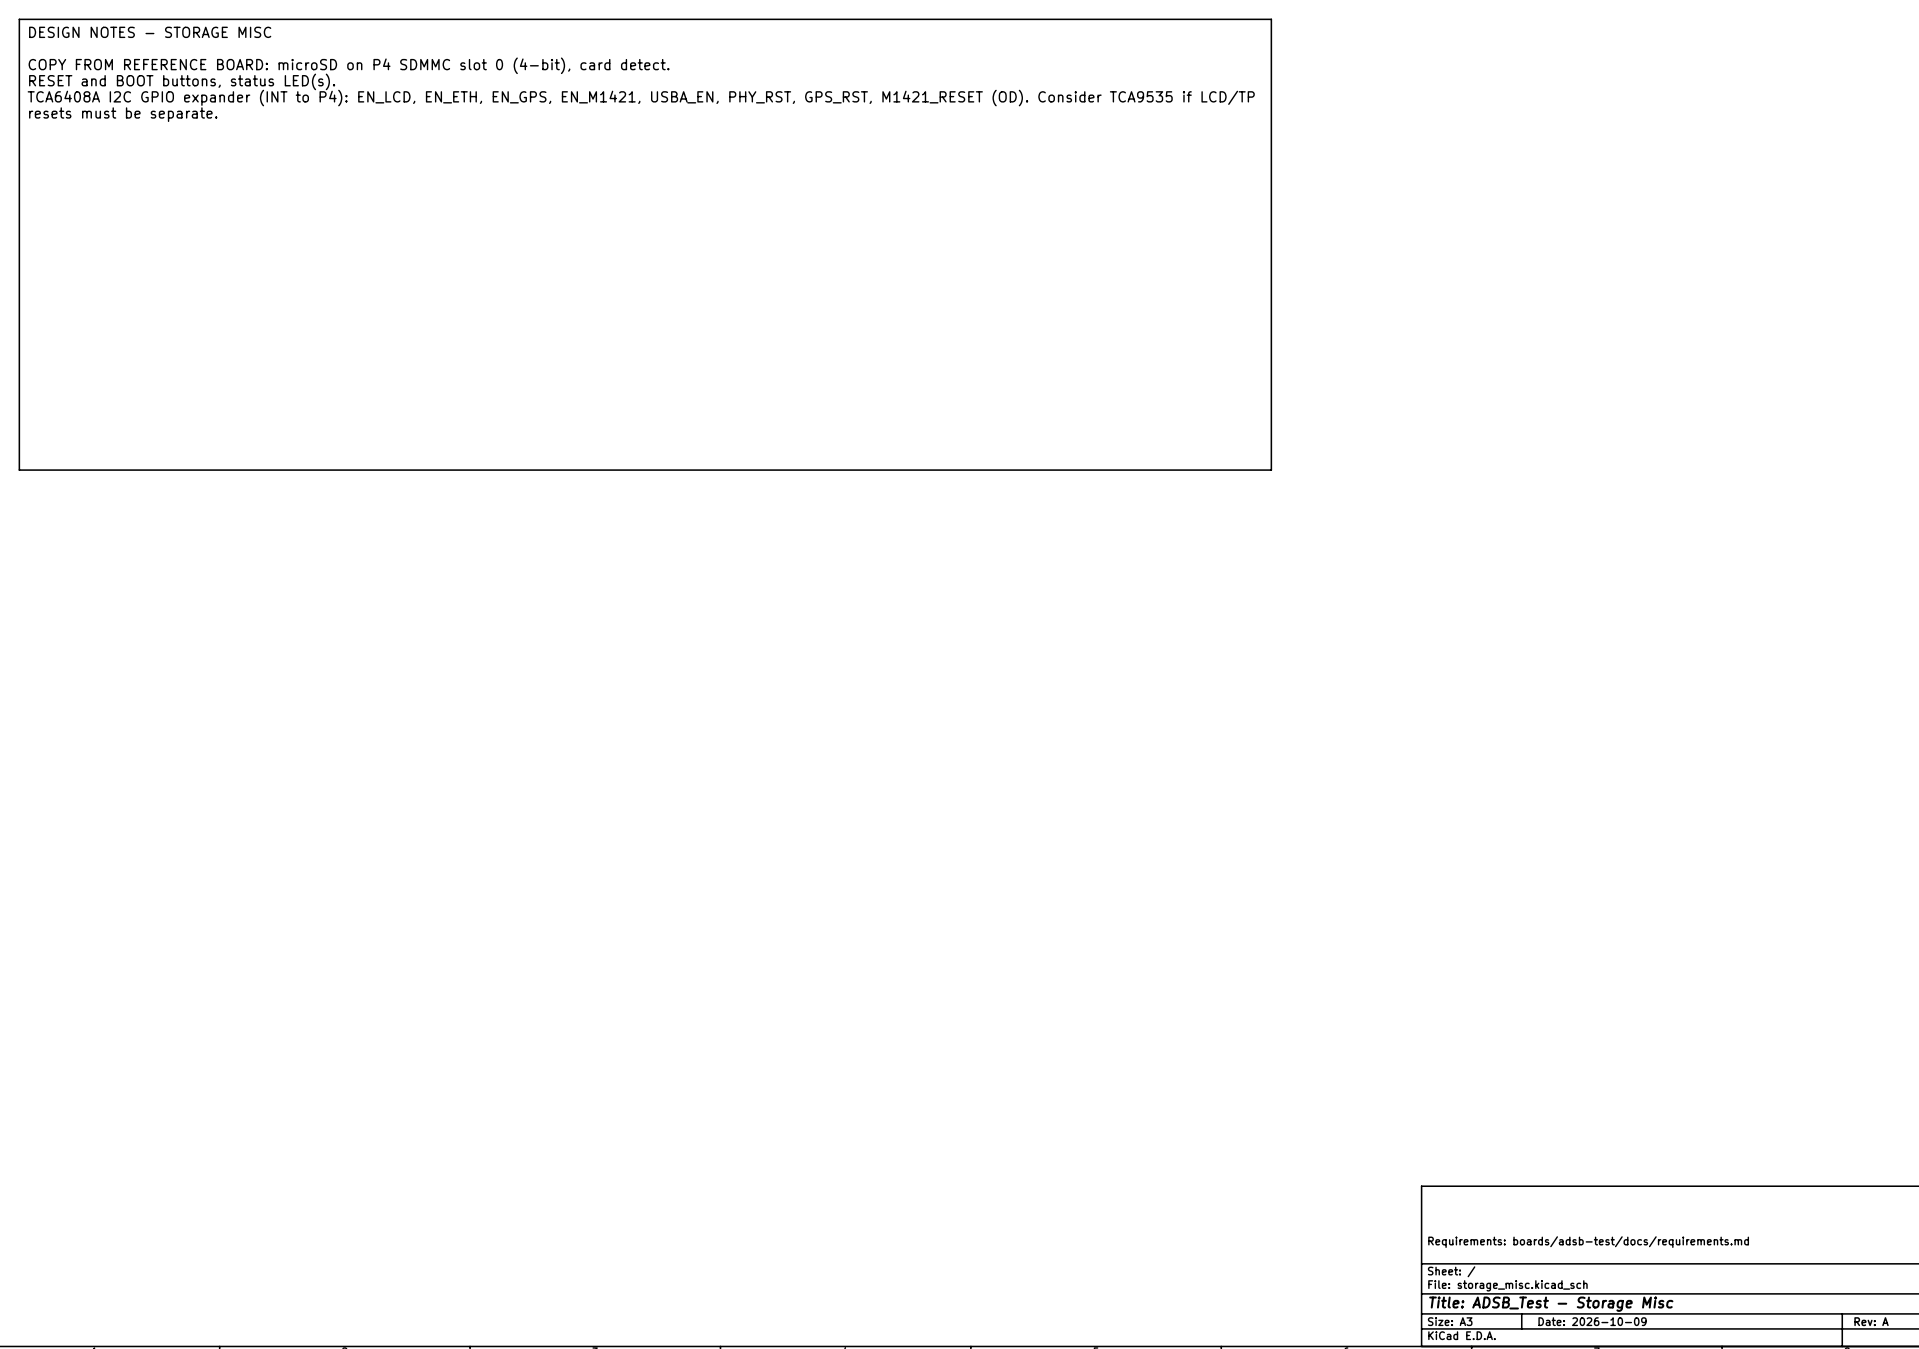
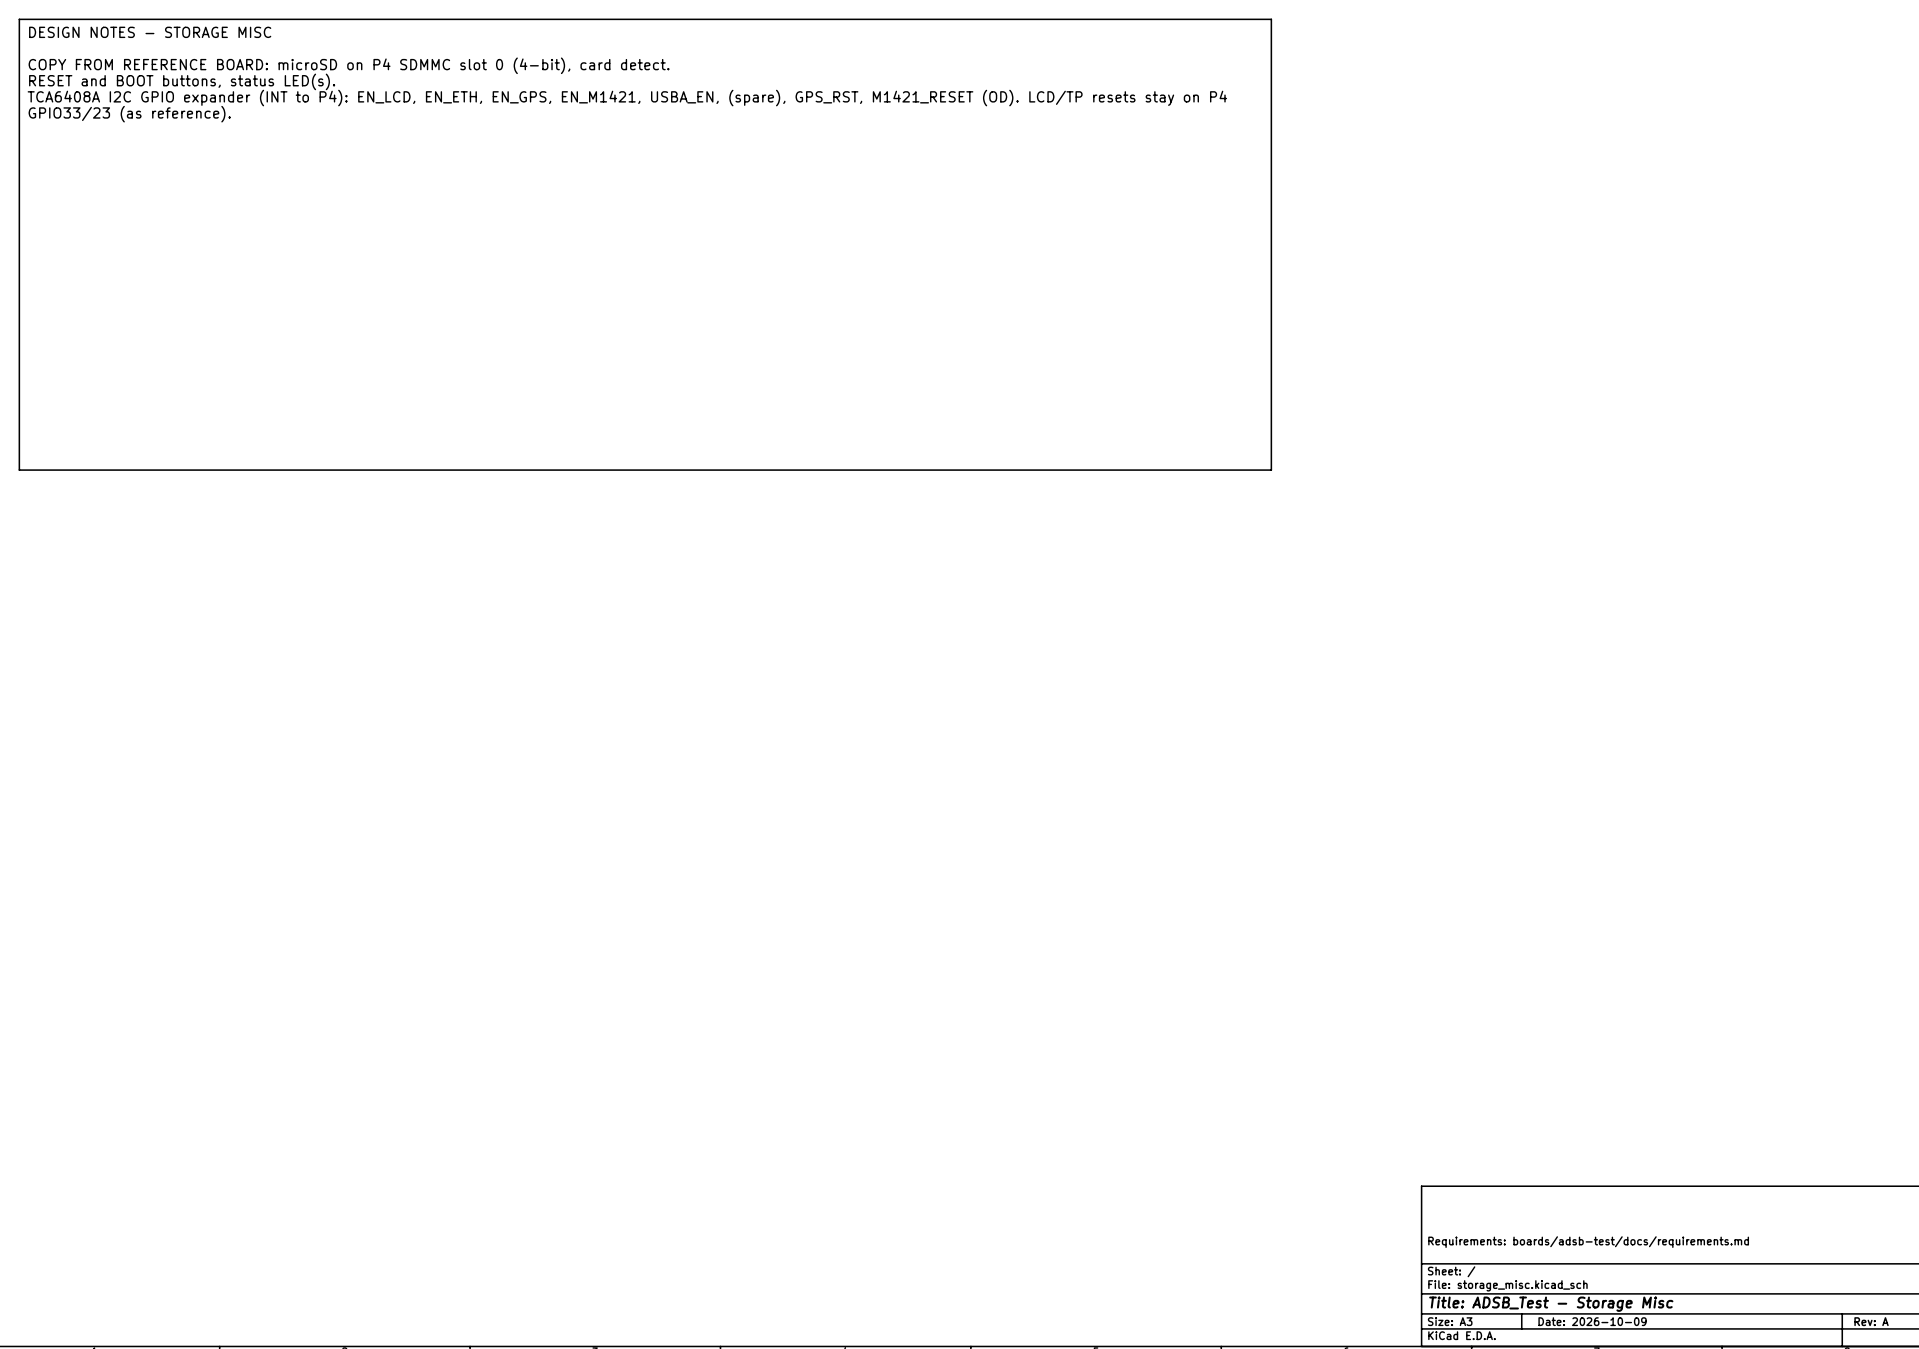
text: TCA6408A I2C GPIO expander (INT to P4): EN_LCD, EN_ETH, EN_GPS, EN_M1421, USBA_EN, PHY_RST, GPS_RST, M1421_RESET (OD). Consider TCA9535 if LCD/TP (641, 98) -> TCA6408A I2C GPIO expander (INT to P4): EN_LCD, EN_ETH, EN_GPS, EN_M1421, USBA_EN, (spare), GPS_RST, M1421_RESET (OD). LCD/TP resets stay on P4 (627, 98)
text: resets must be separate. (123, 114) -> GPIO33/23 (as reference). (129, 114)

